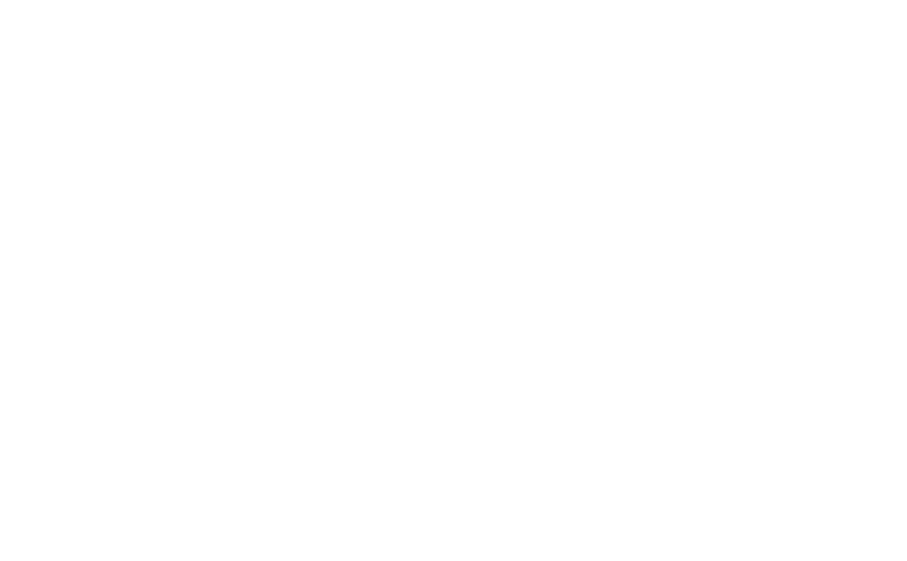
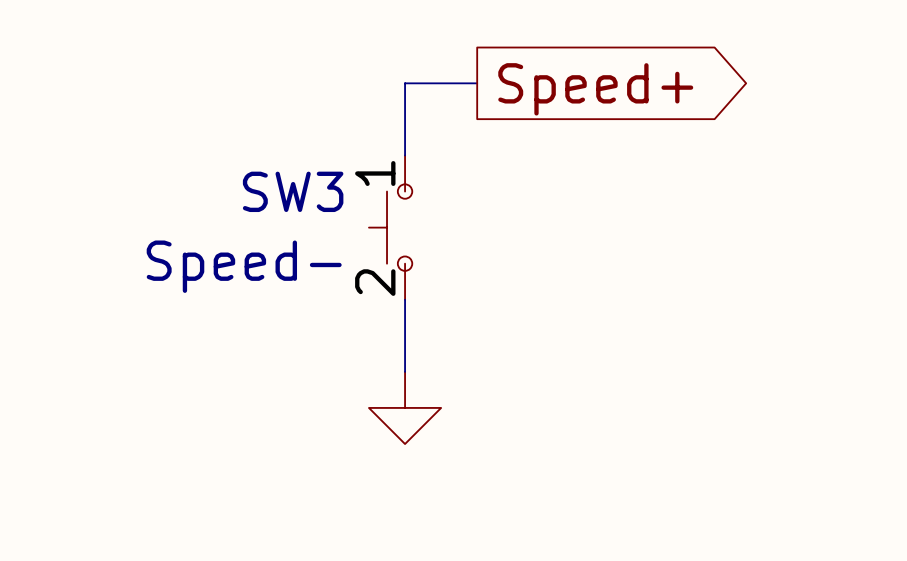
wire: none -> (477, 83) (405, 83) (405, 155)
global label: none -> Speed+ (595, 89)
SW3: none -> Speed- (390, 227)
wire: none -> (405, 299) (405, 371)
power symbol: none -> (405, 407)

